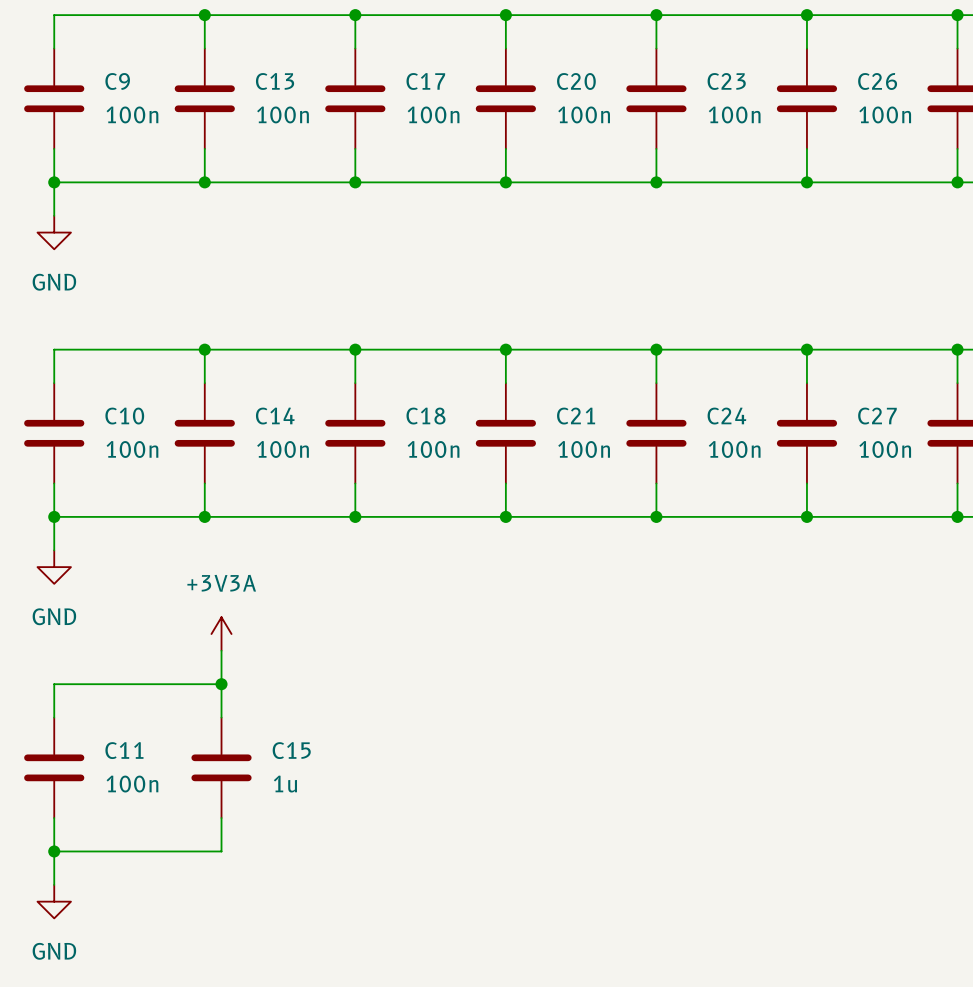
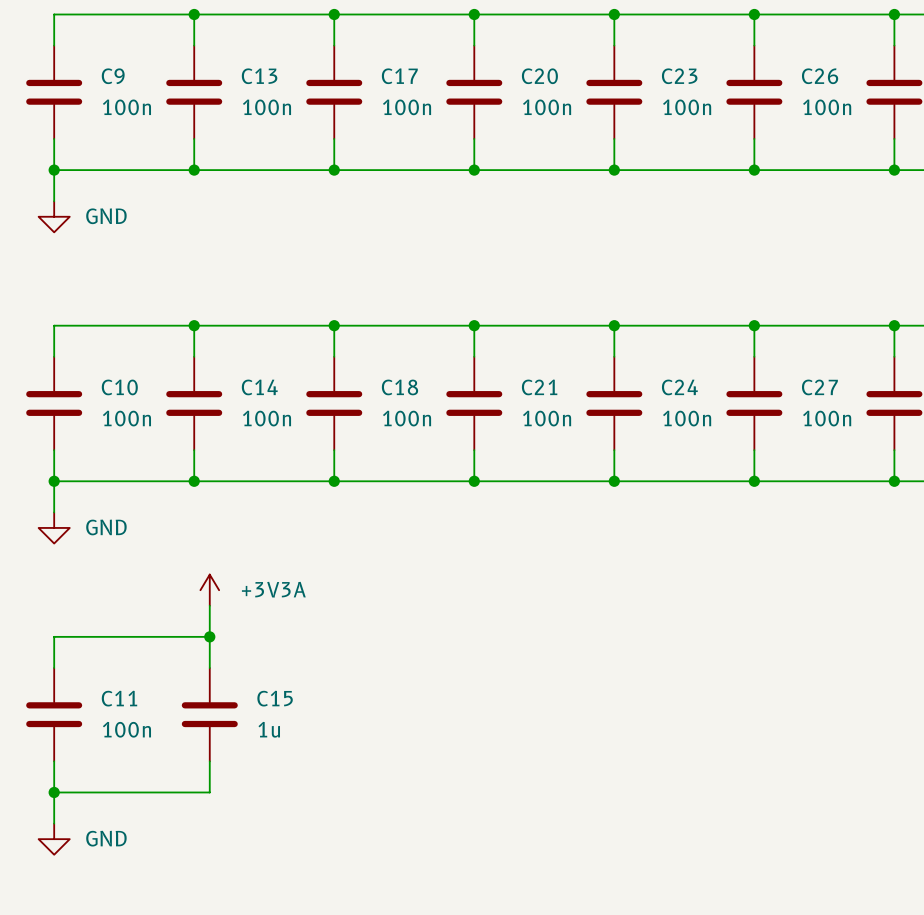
power symbol text position: GND (54, 282) -> GND (106, 216)
power symbol text position: +3V3A (221, 583) -> +3V3A (273, 589)
power symbol text position: GND (54, 616) -> GND (106, 527)
power symbol text position: GND (54, 951) -> GND (106, 838)

